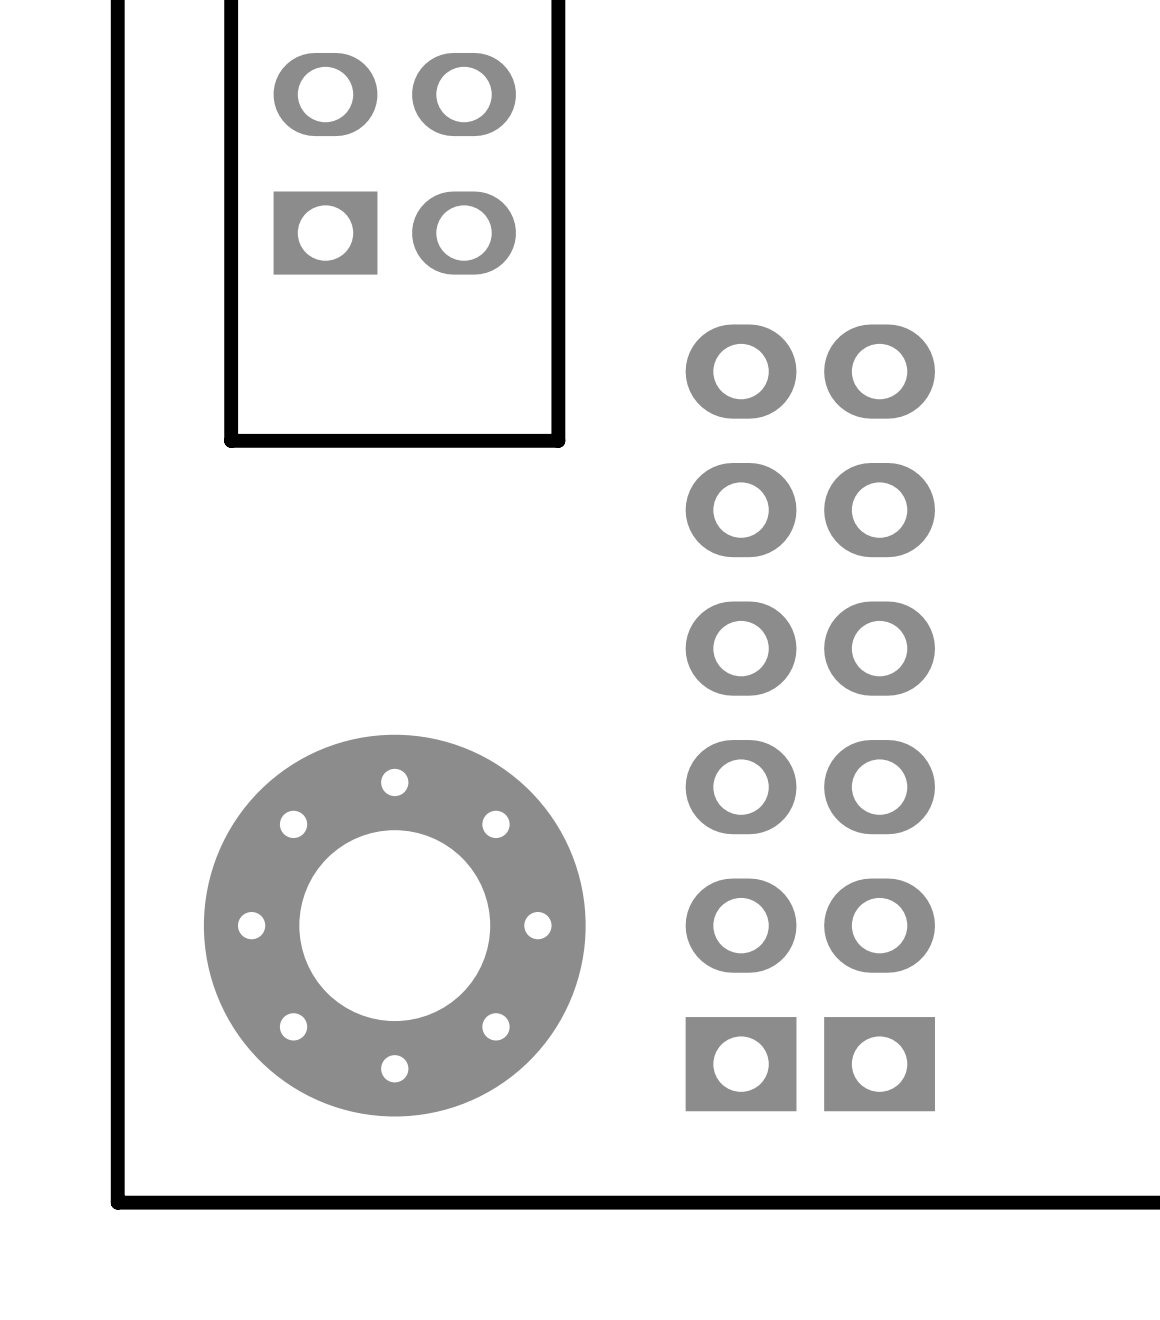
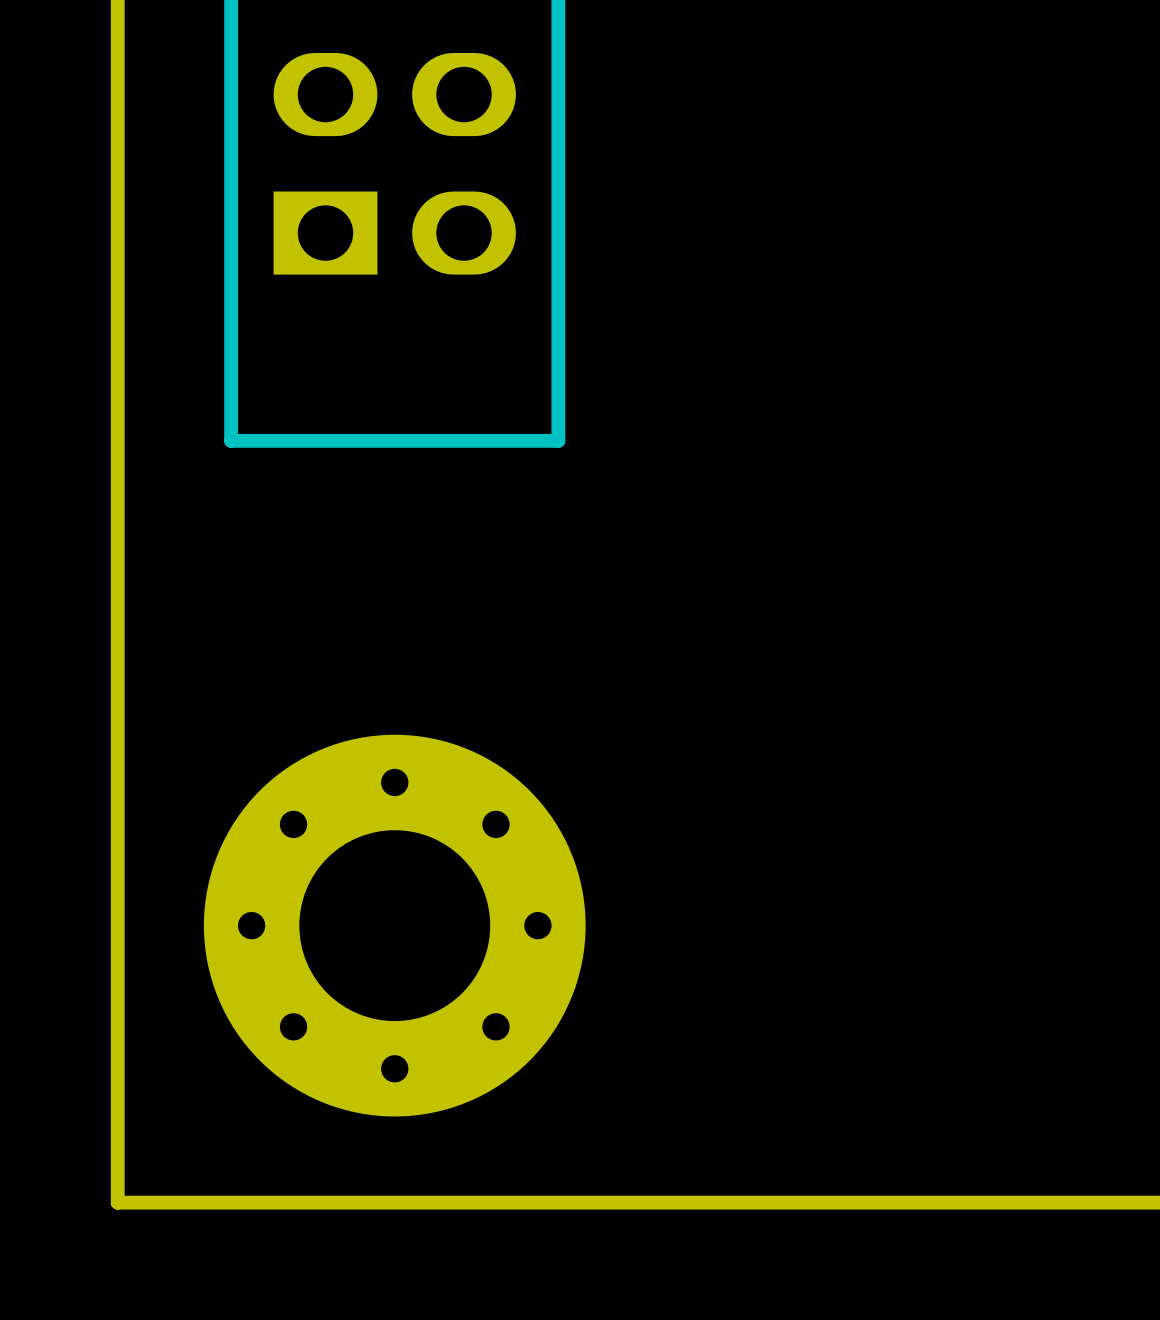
part: (741, 717) -> none
part: (879, 717) -> none

